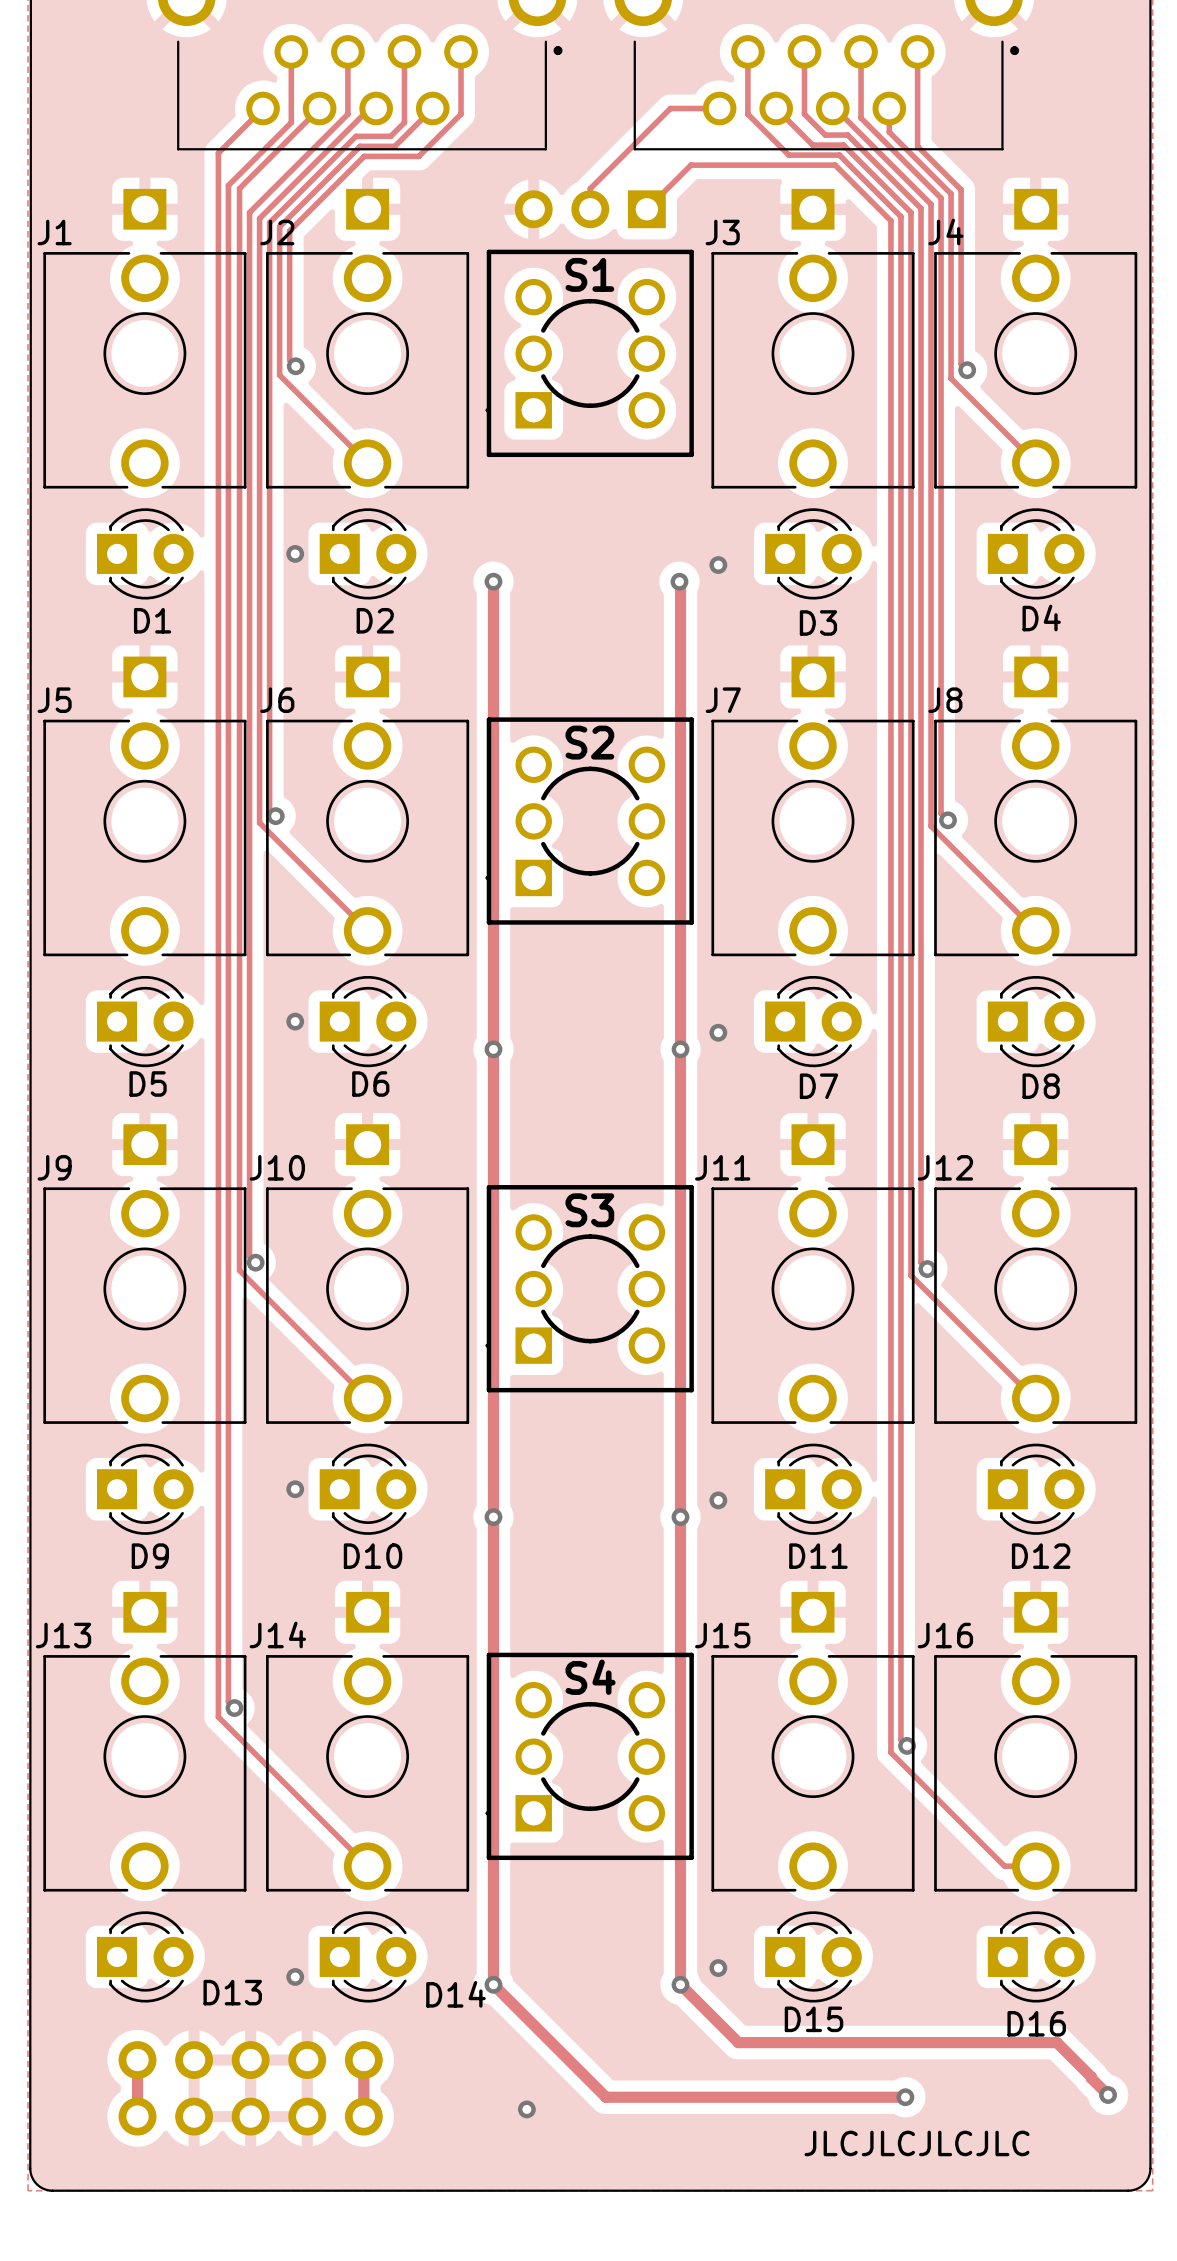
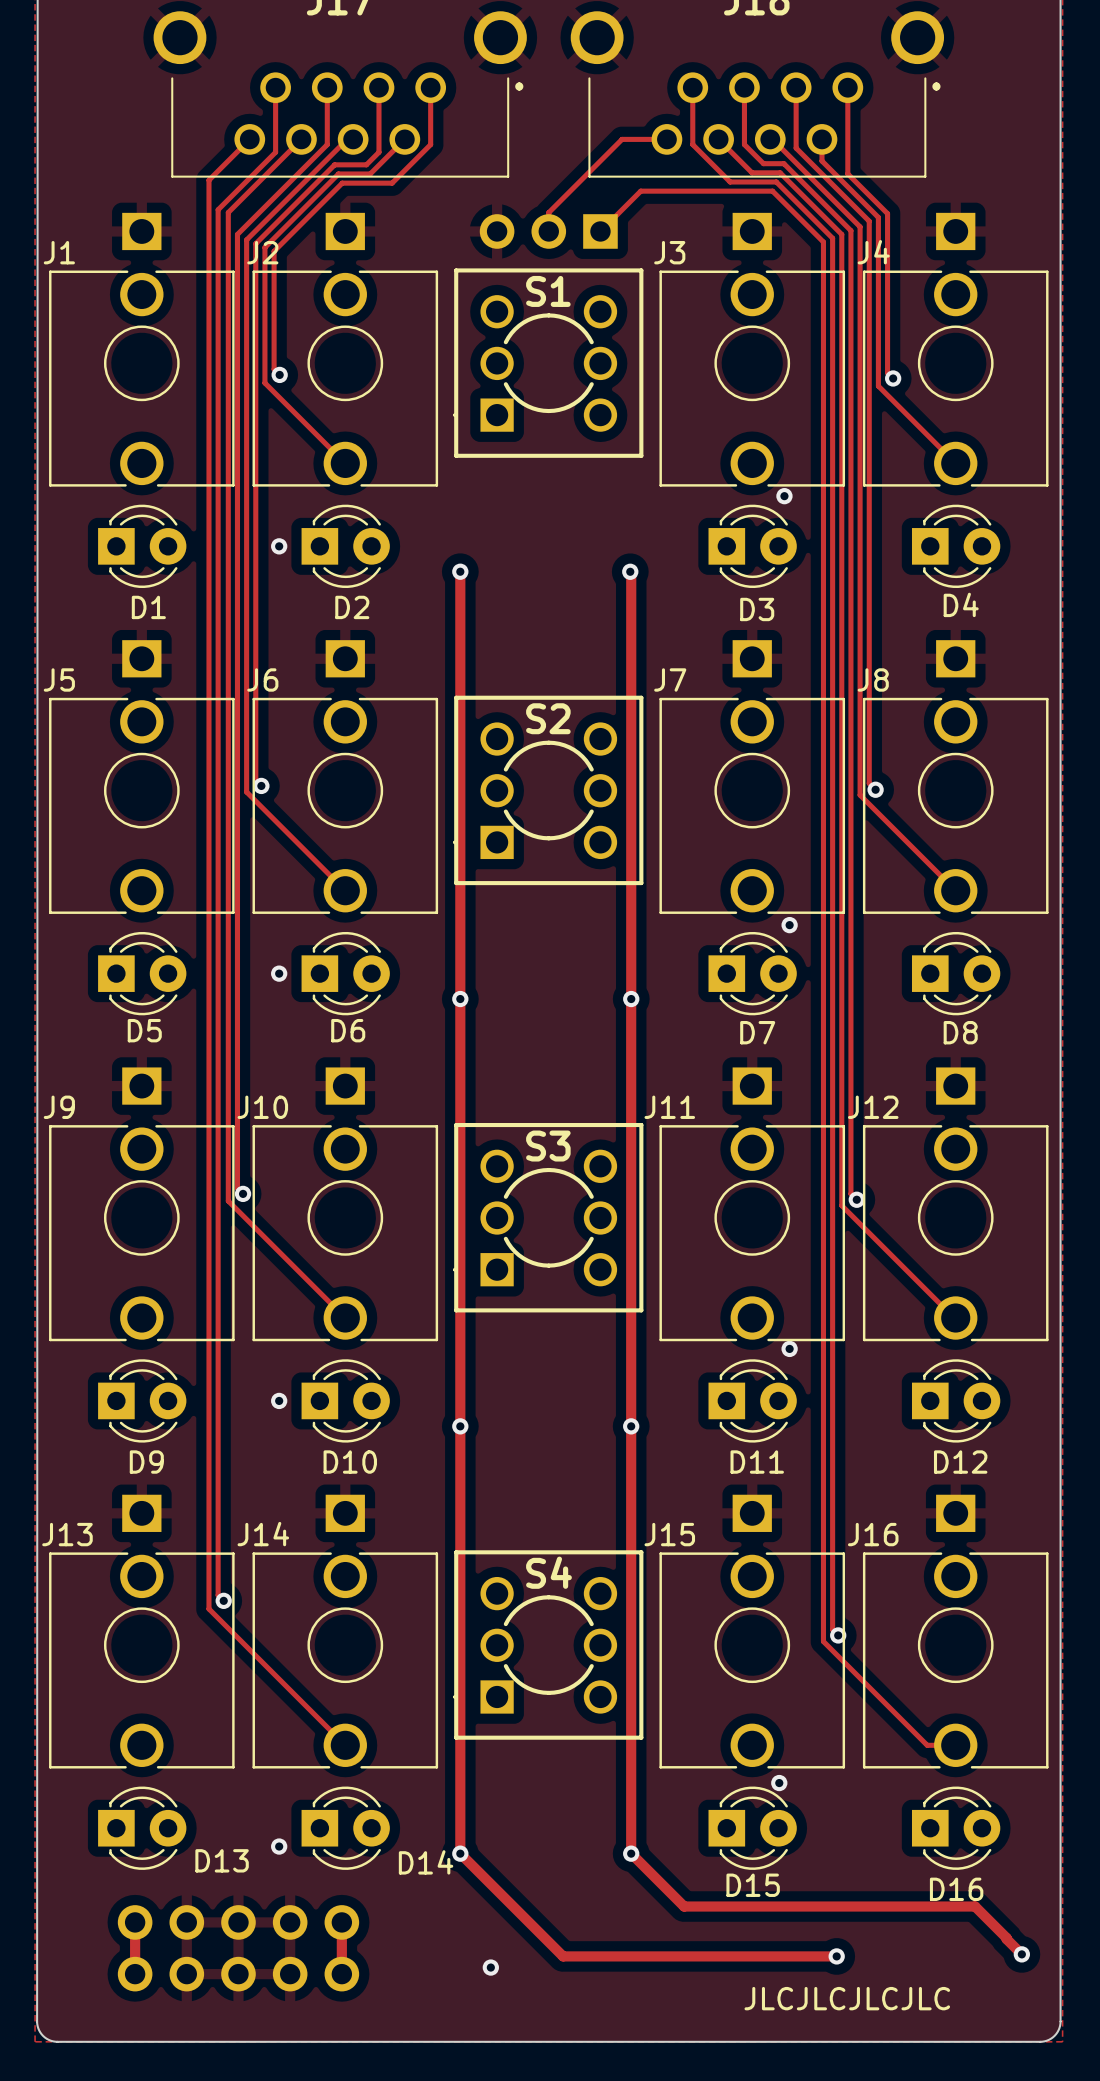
via: none -> (784, 496)
via: (718, 565) -> none
via: none -> (789, 925)
via: (718, 1032) -> none
via: none -> (789, 1348)
via: (718, 1500) -> none
via: none -> (779, 1783)
via: (718, 1968) -> none

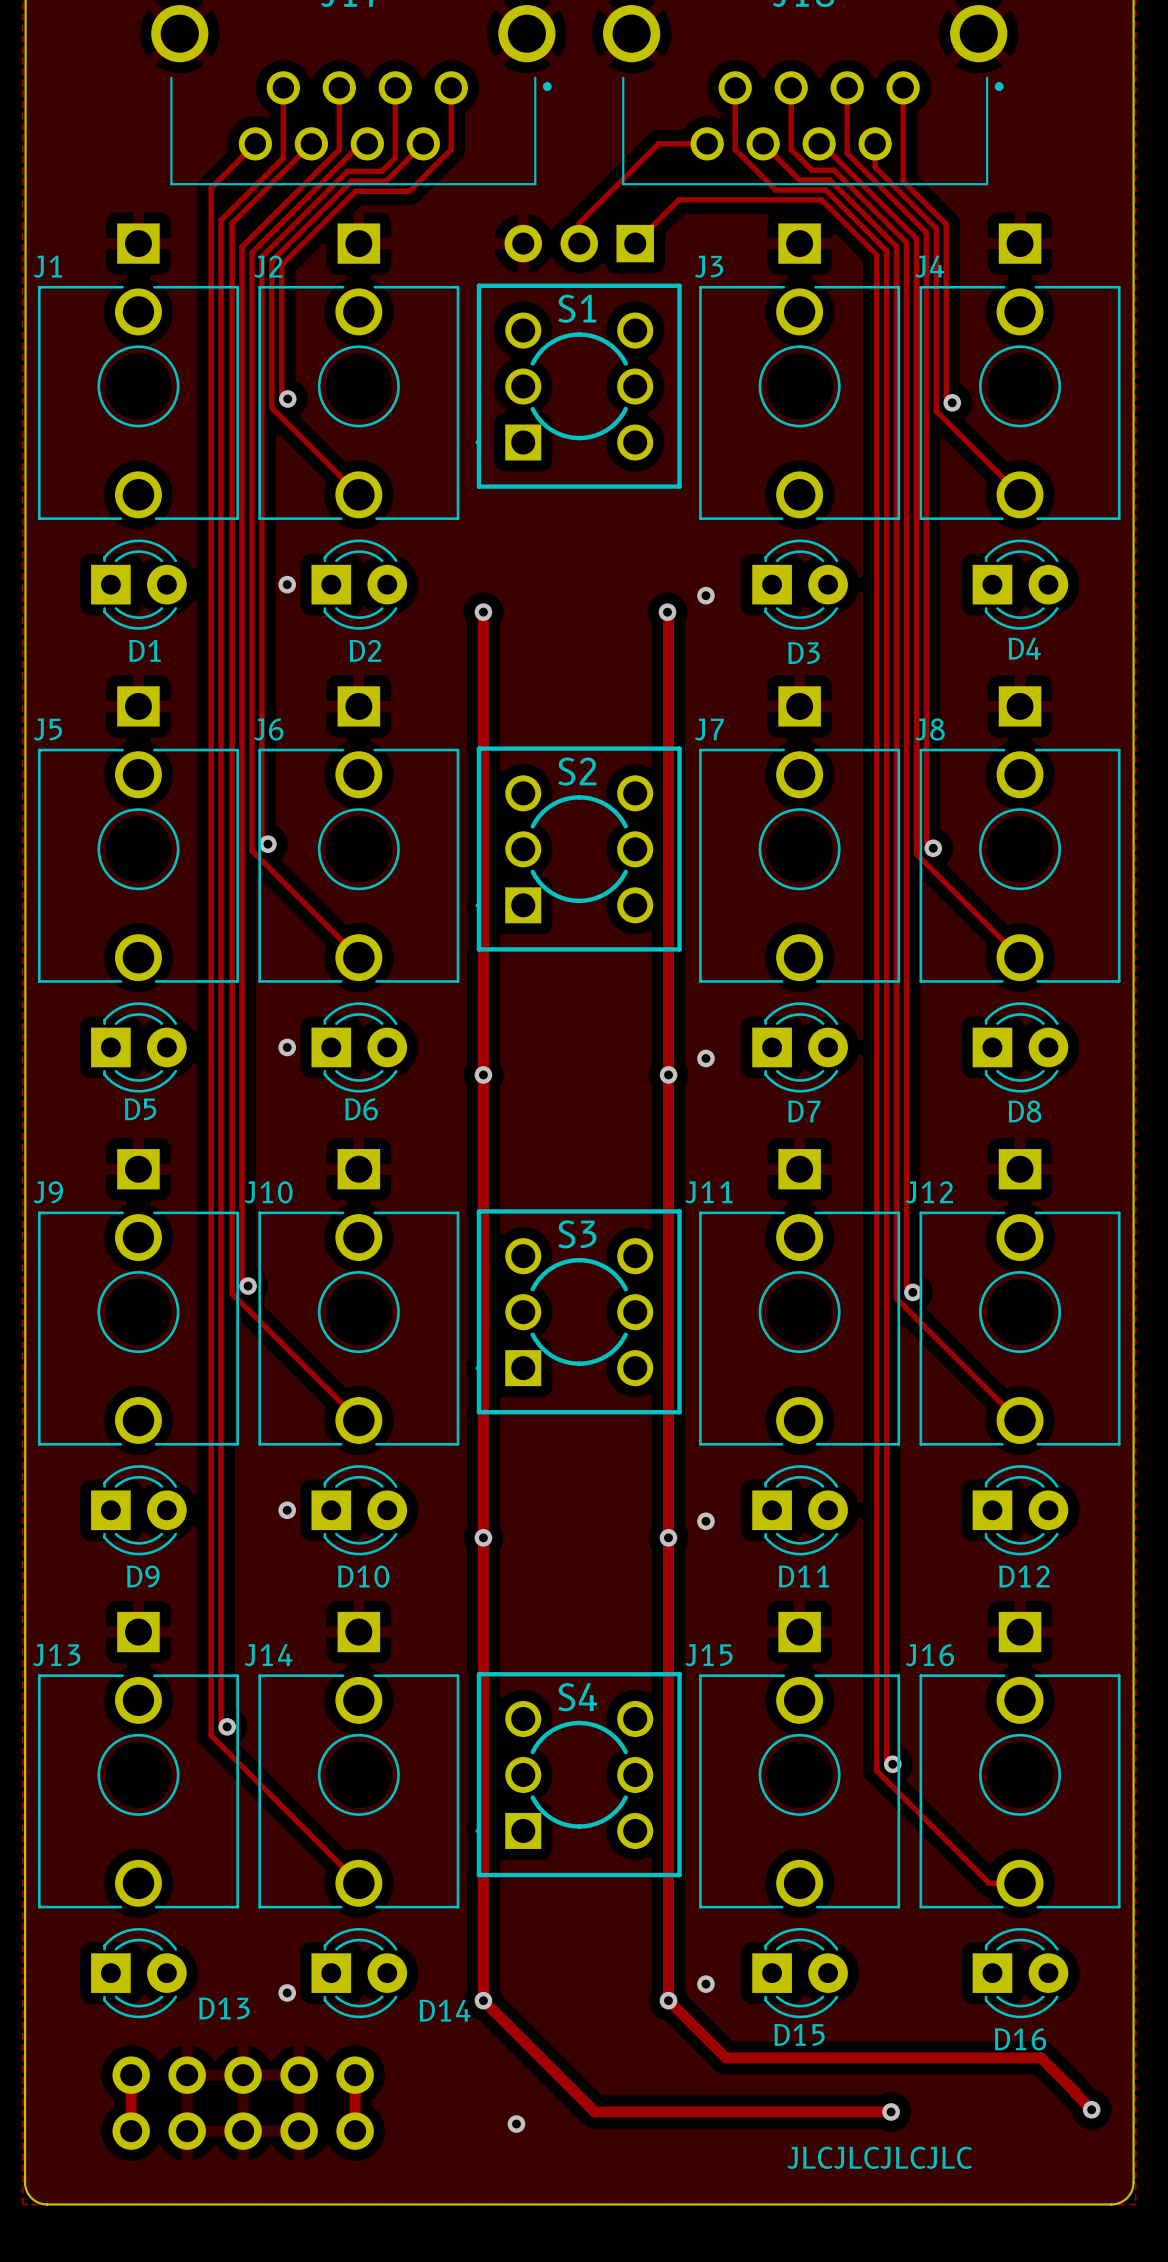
via: (784, 496) -> none
via: none -> (705, 595)
via: (789, 925) -> none
via: none -> (705, 1058)
via: (789, 1348) -> none
via: none -> (705, 1521)
via: (779, 1783) -> none
via: none -> (705, 1984)

